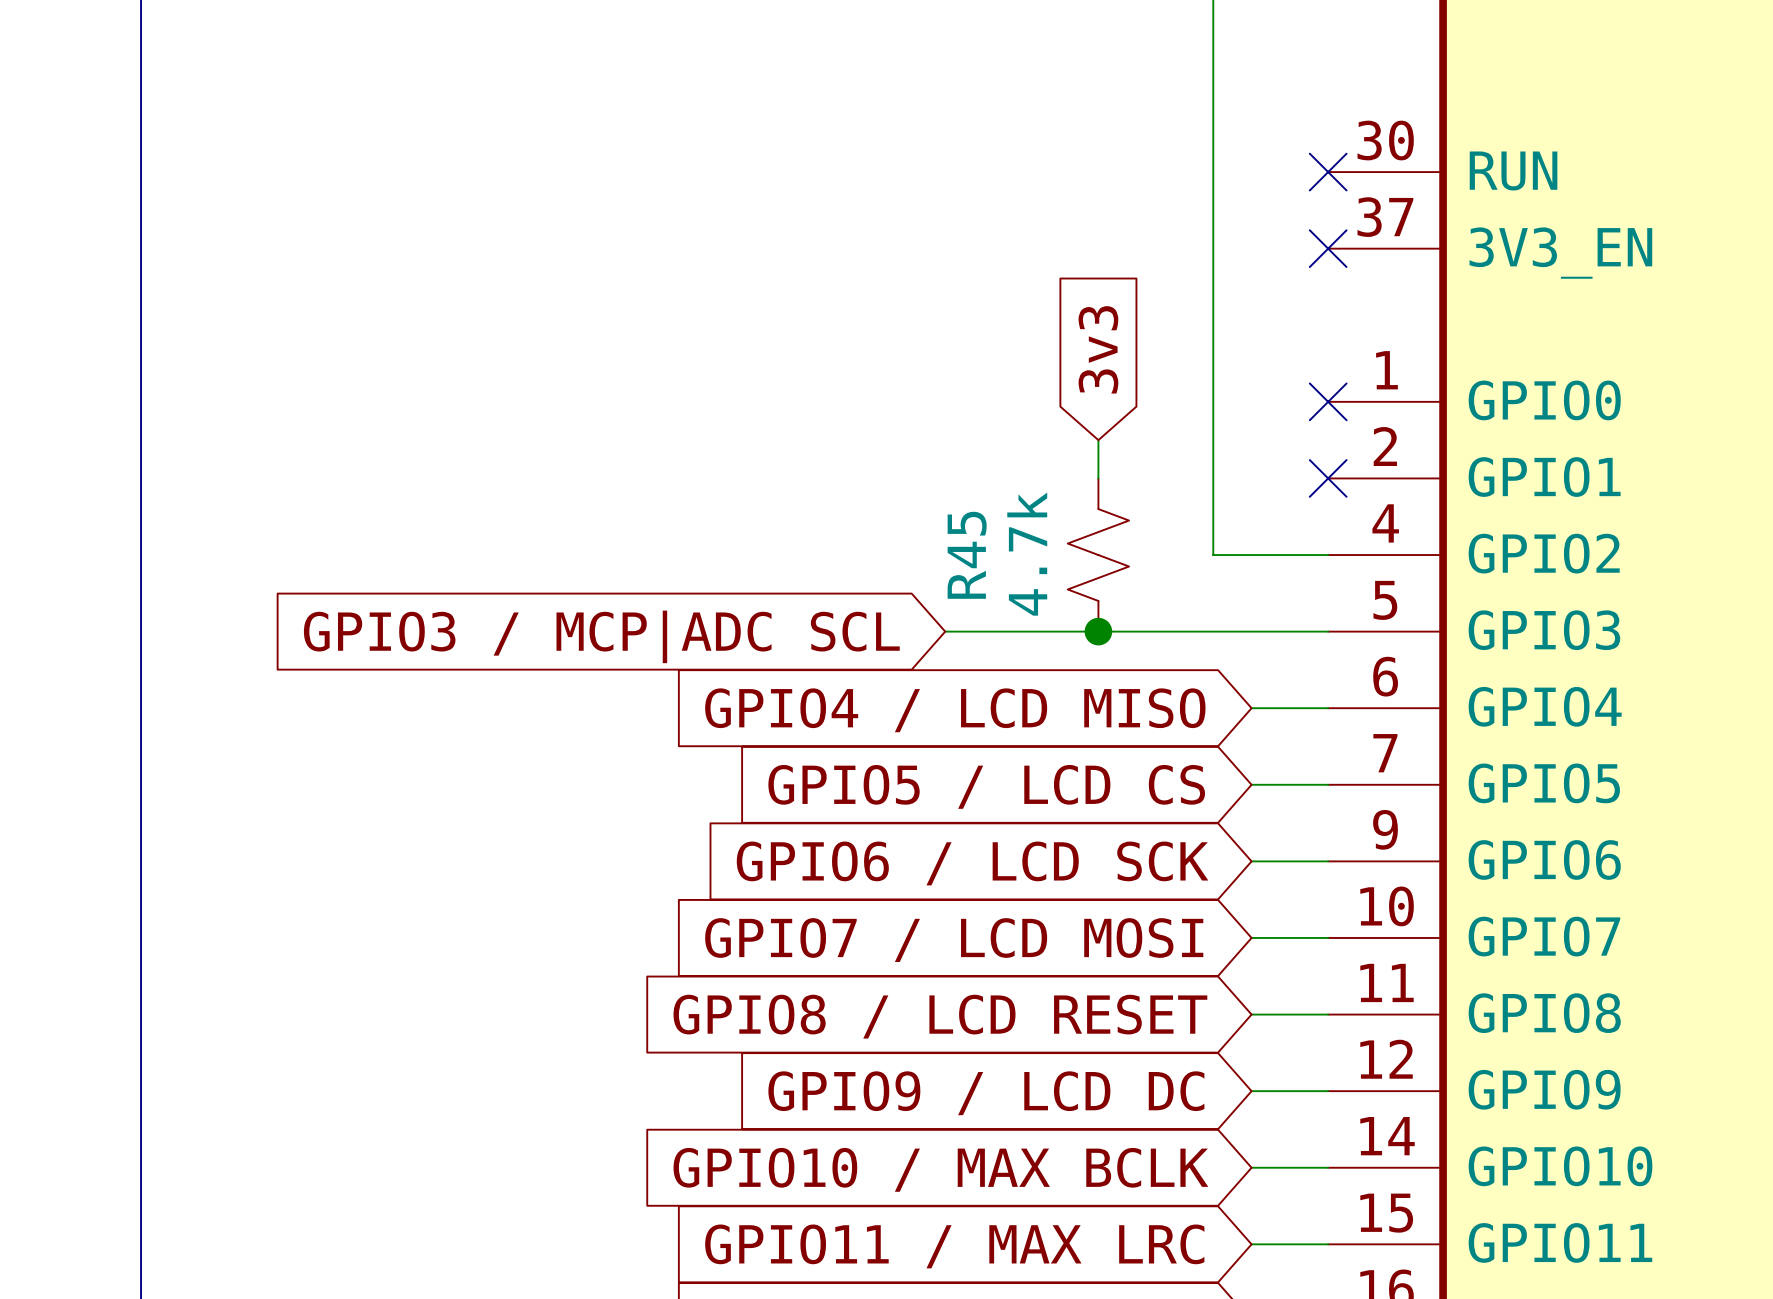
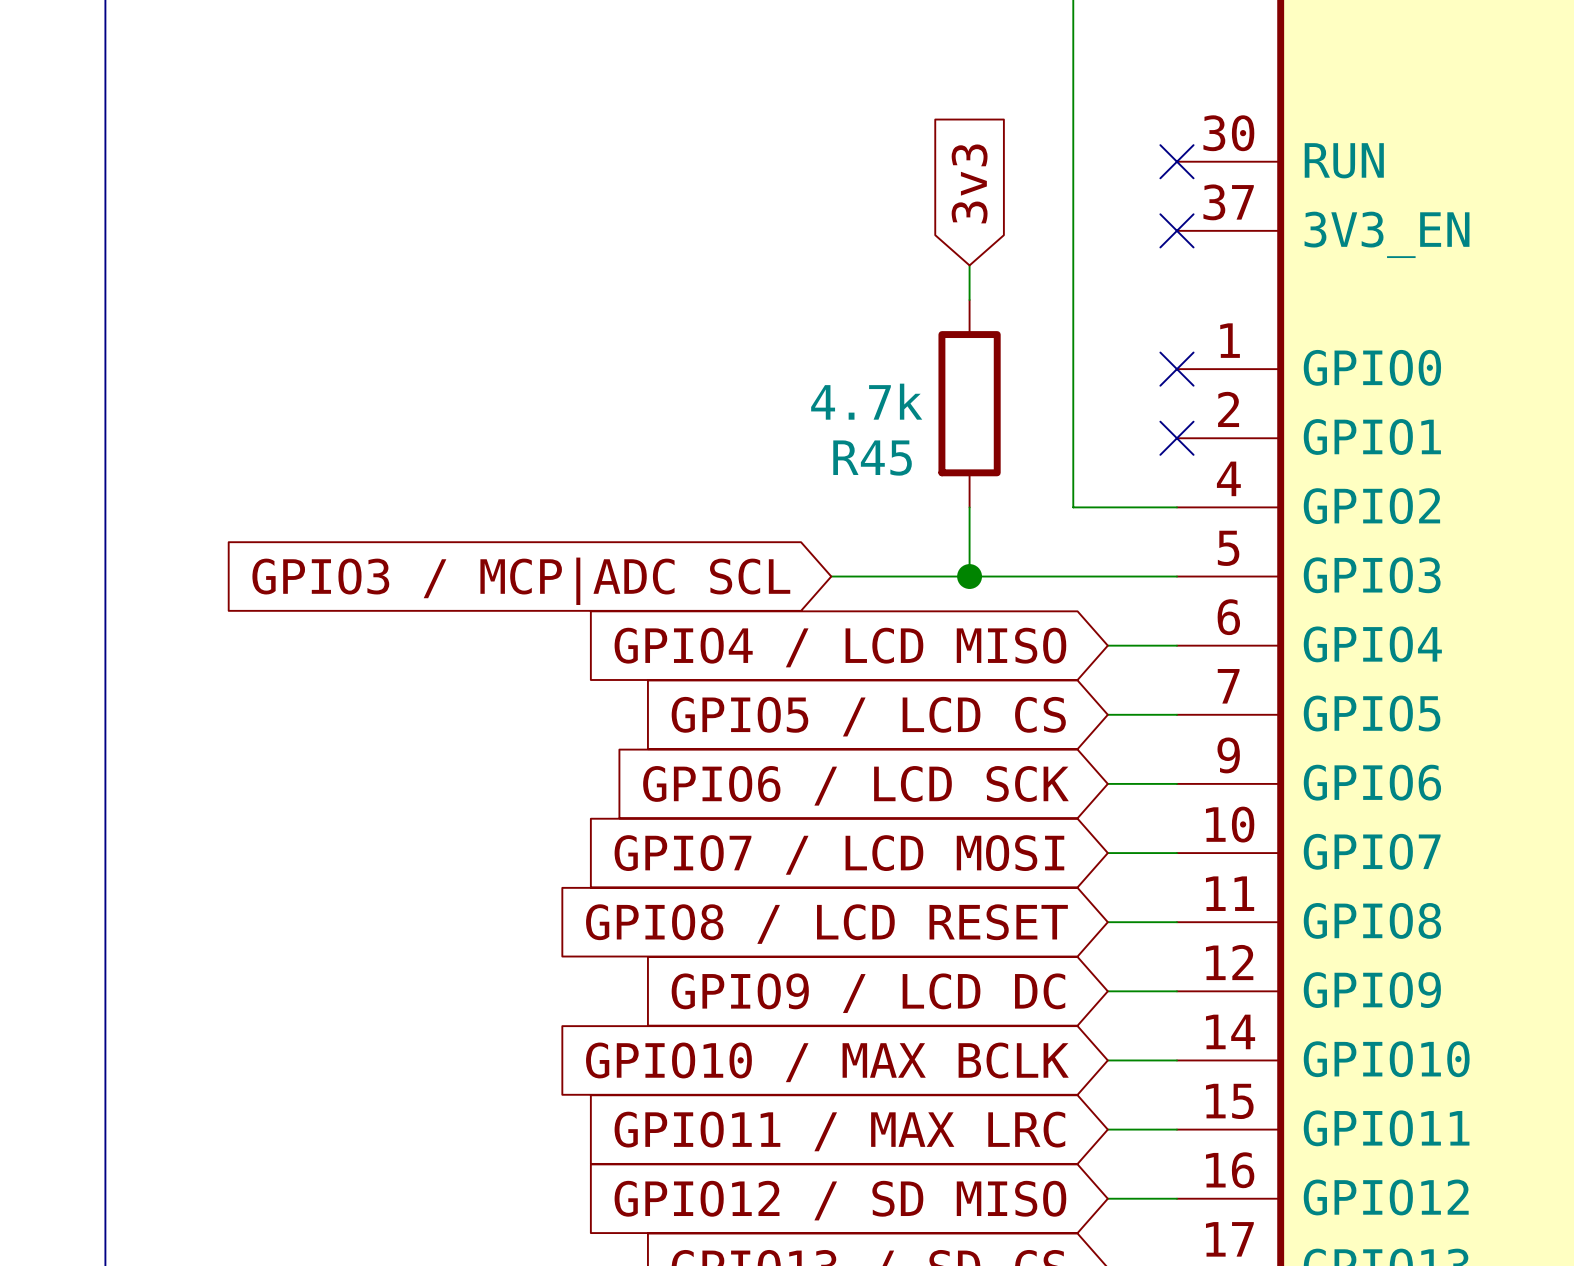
global label position: 3v3 (1098, 349) -> 3v3 (969, 183)
wire: (1098, 440) (1098, 478) -> (969, 265) (969, 299)
R45 symbol: [1067, 478, 1130, 632] -> [938, 299, 1001, 508]
R45 name position: R45 (967, 555) -> R45 (872, 458)
wire: none -> (969, 507) (969, 576)

